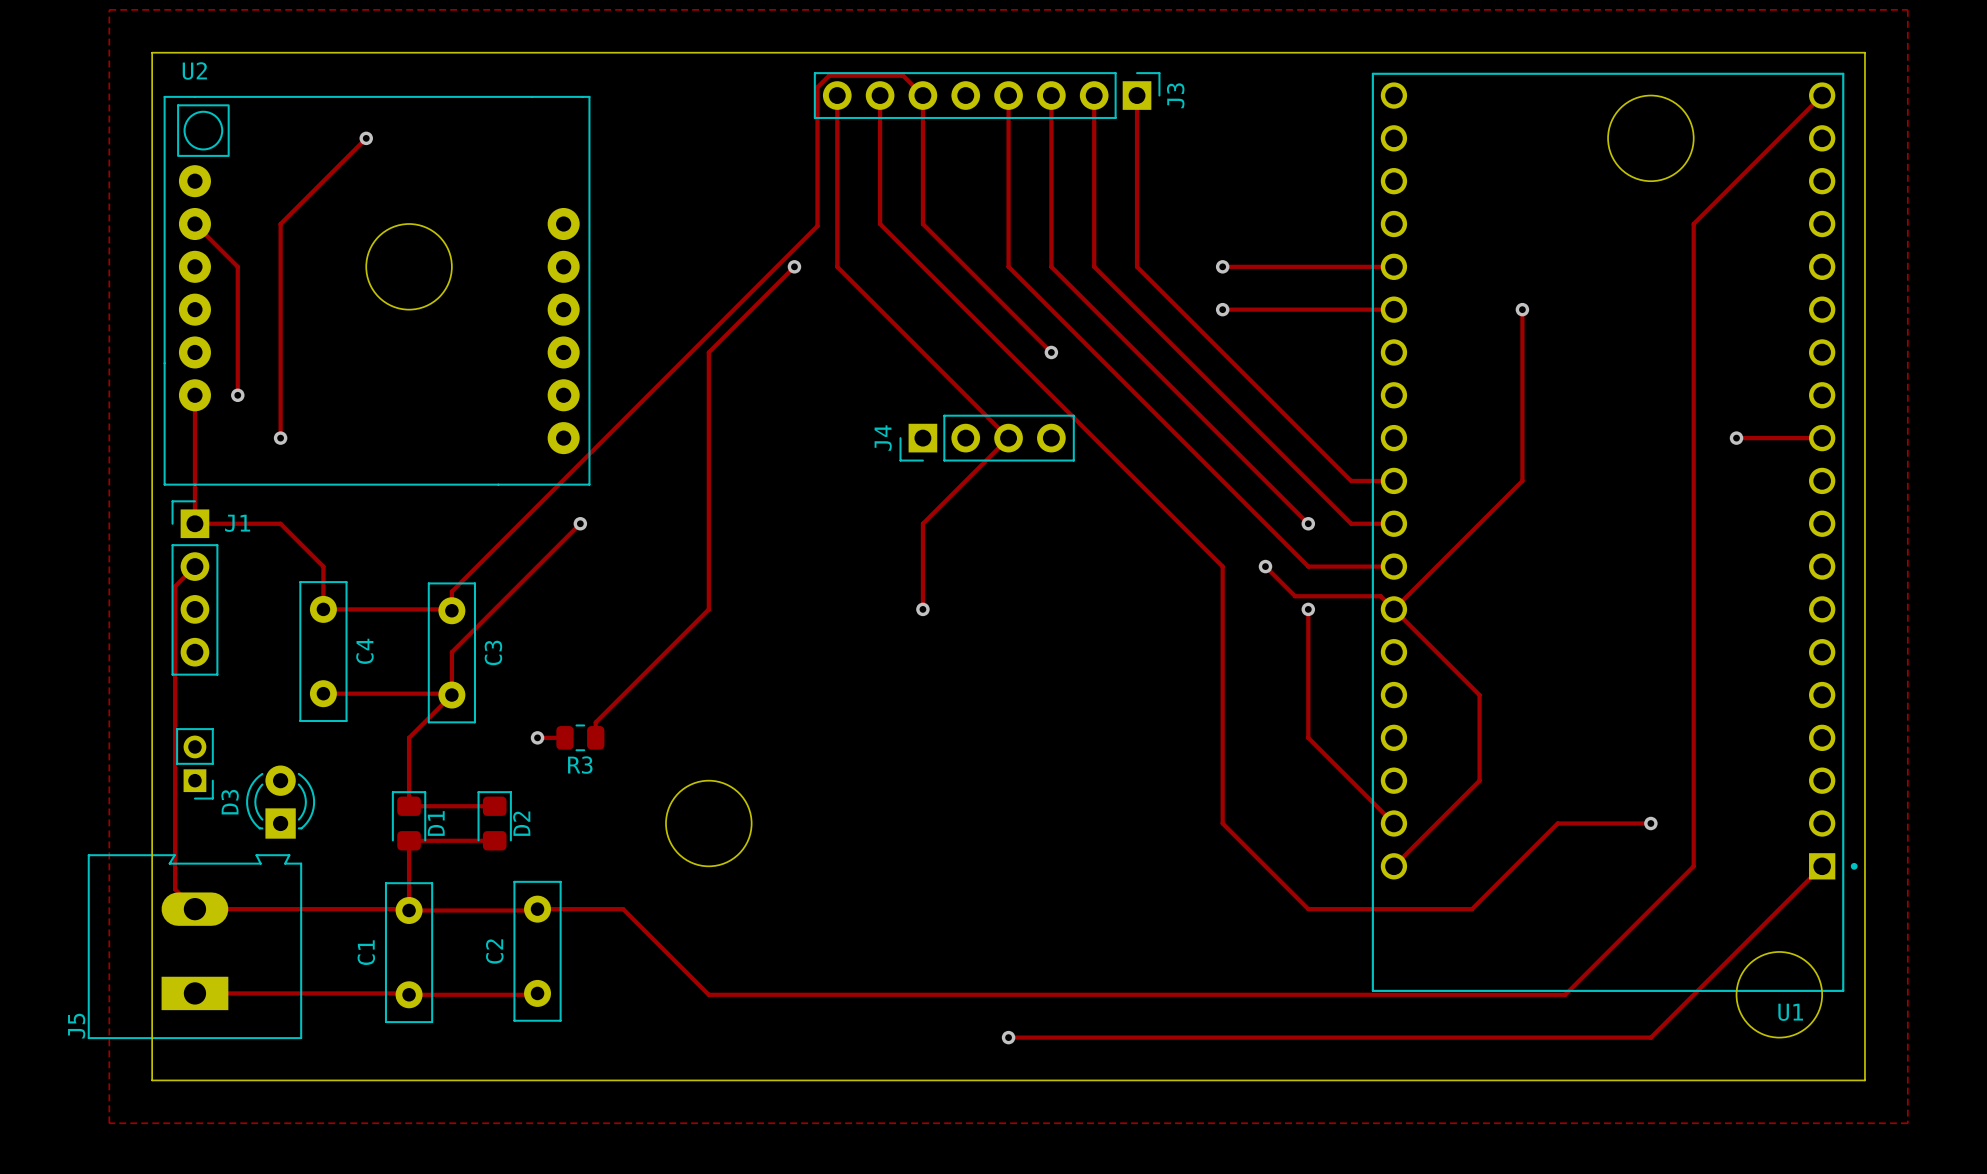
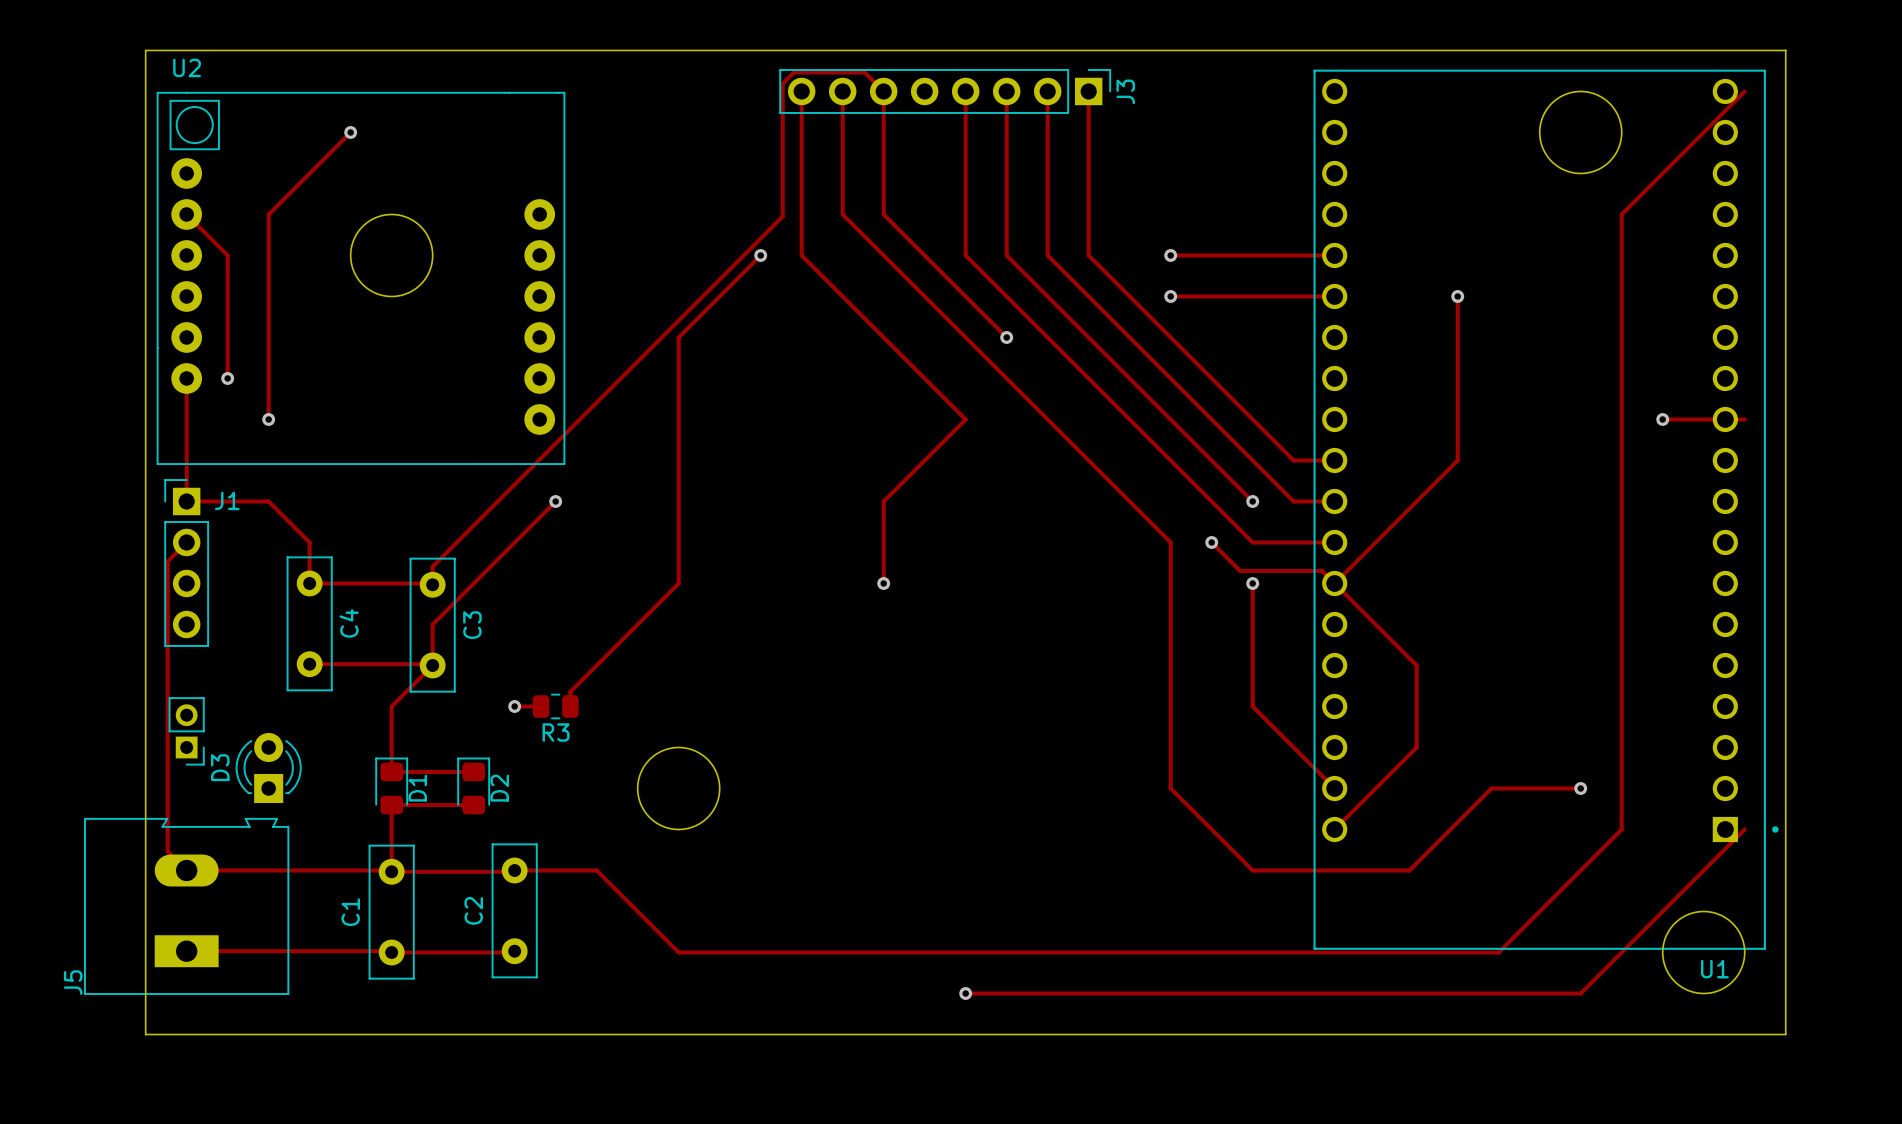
zone outline: (109, 9) (1907, 9) (1907, 1123) (109, 1123) (109, 9) -> none
U1 footprint: [1371, 72, 1858, 992] -> [1313, 69, 1779, 950]
J4: (987, 438) -> none

